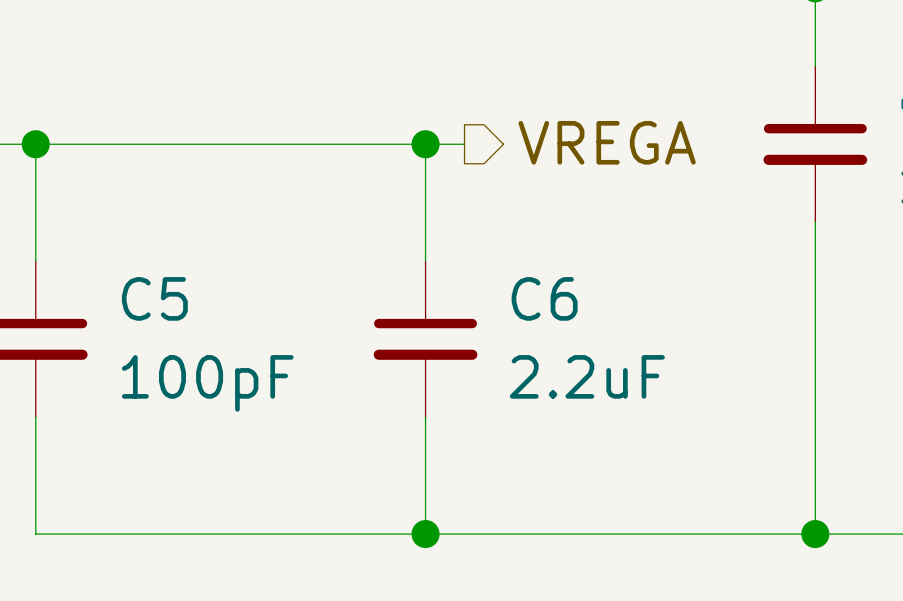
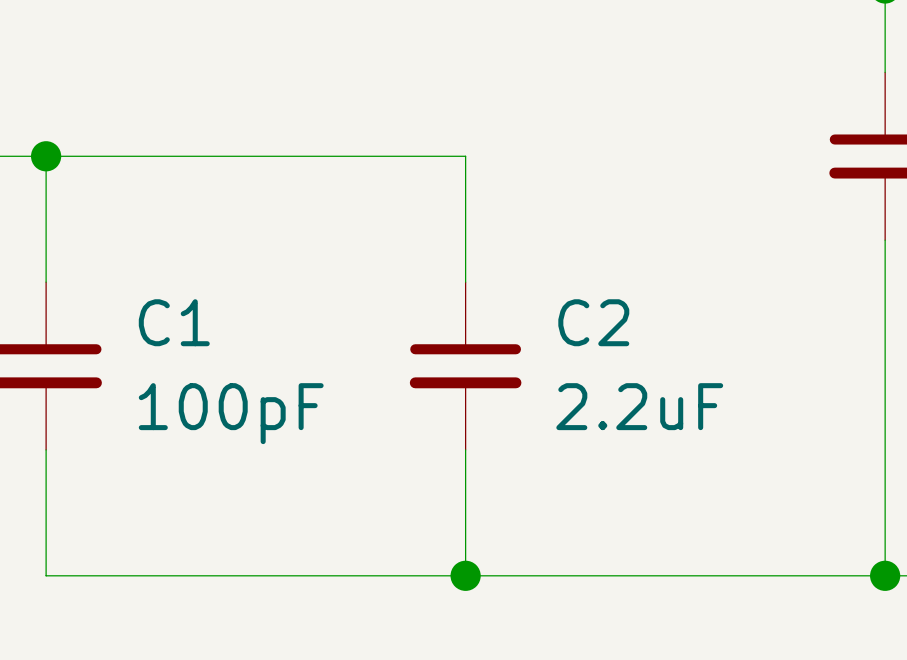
hierarchical label: VREGA (607, 142) -> none
wire: (425, 144) (464, 144) -> none
junction: (425, 144) -> none
C5 name: C5 (154, 298) -> C1 (174, 322)
C6 name: C6 (544, 298) -> C2 (593, 322)

